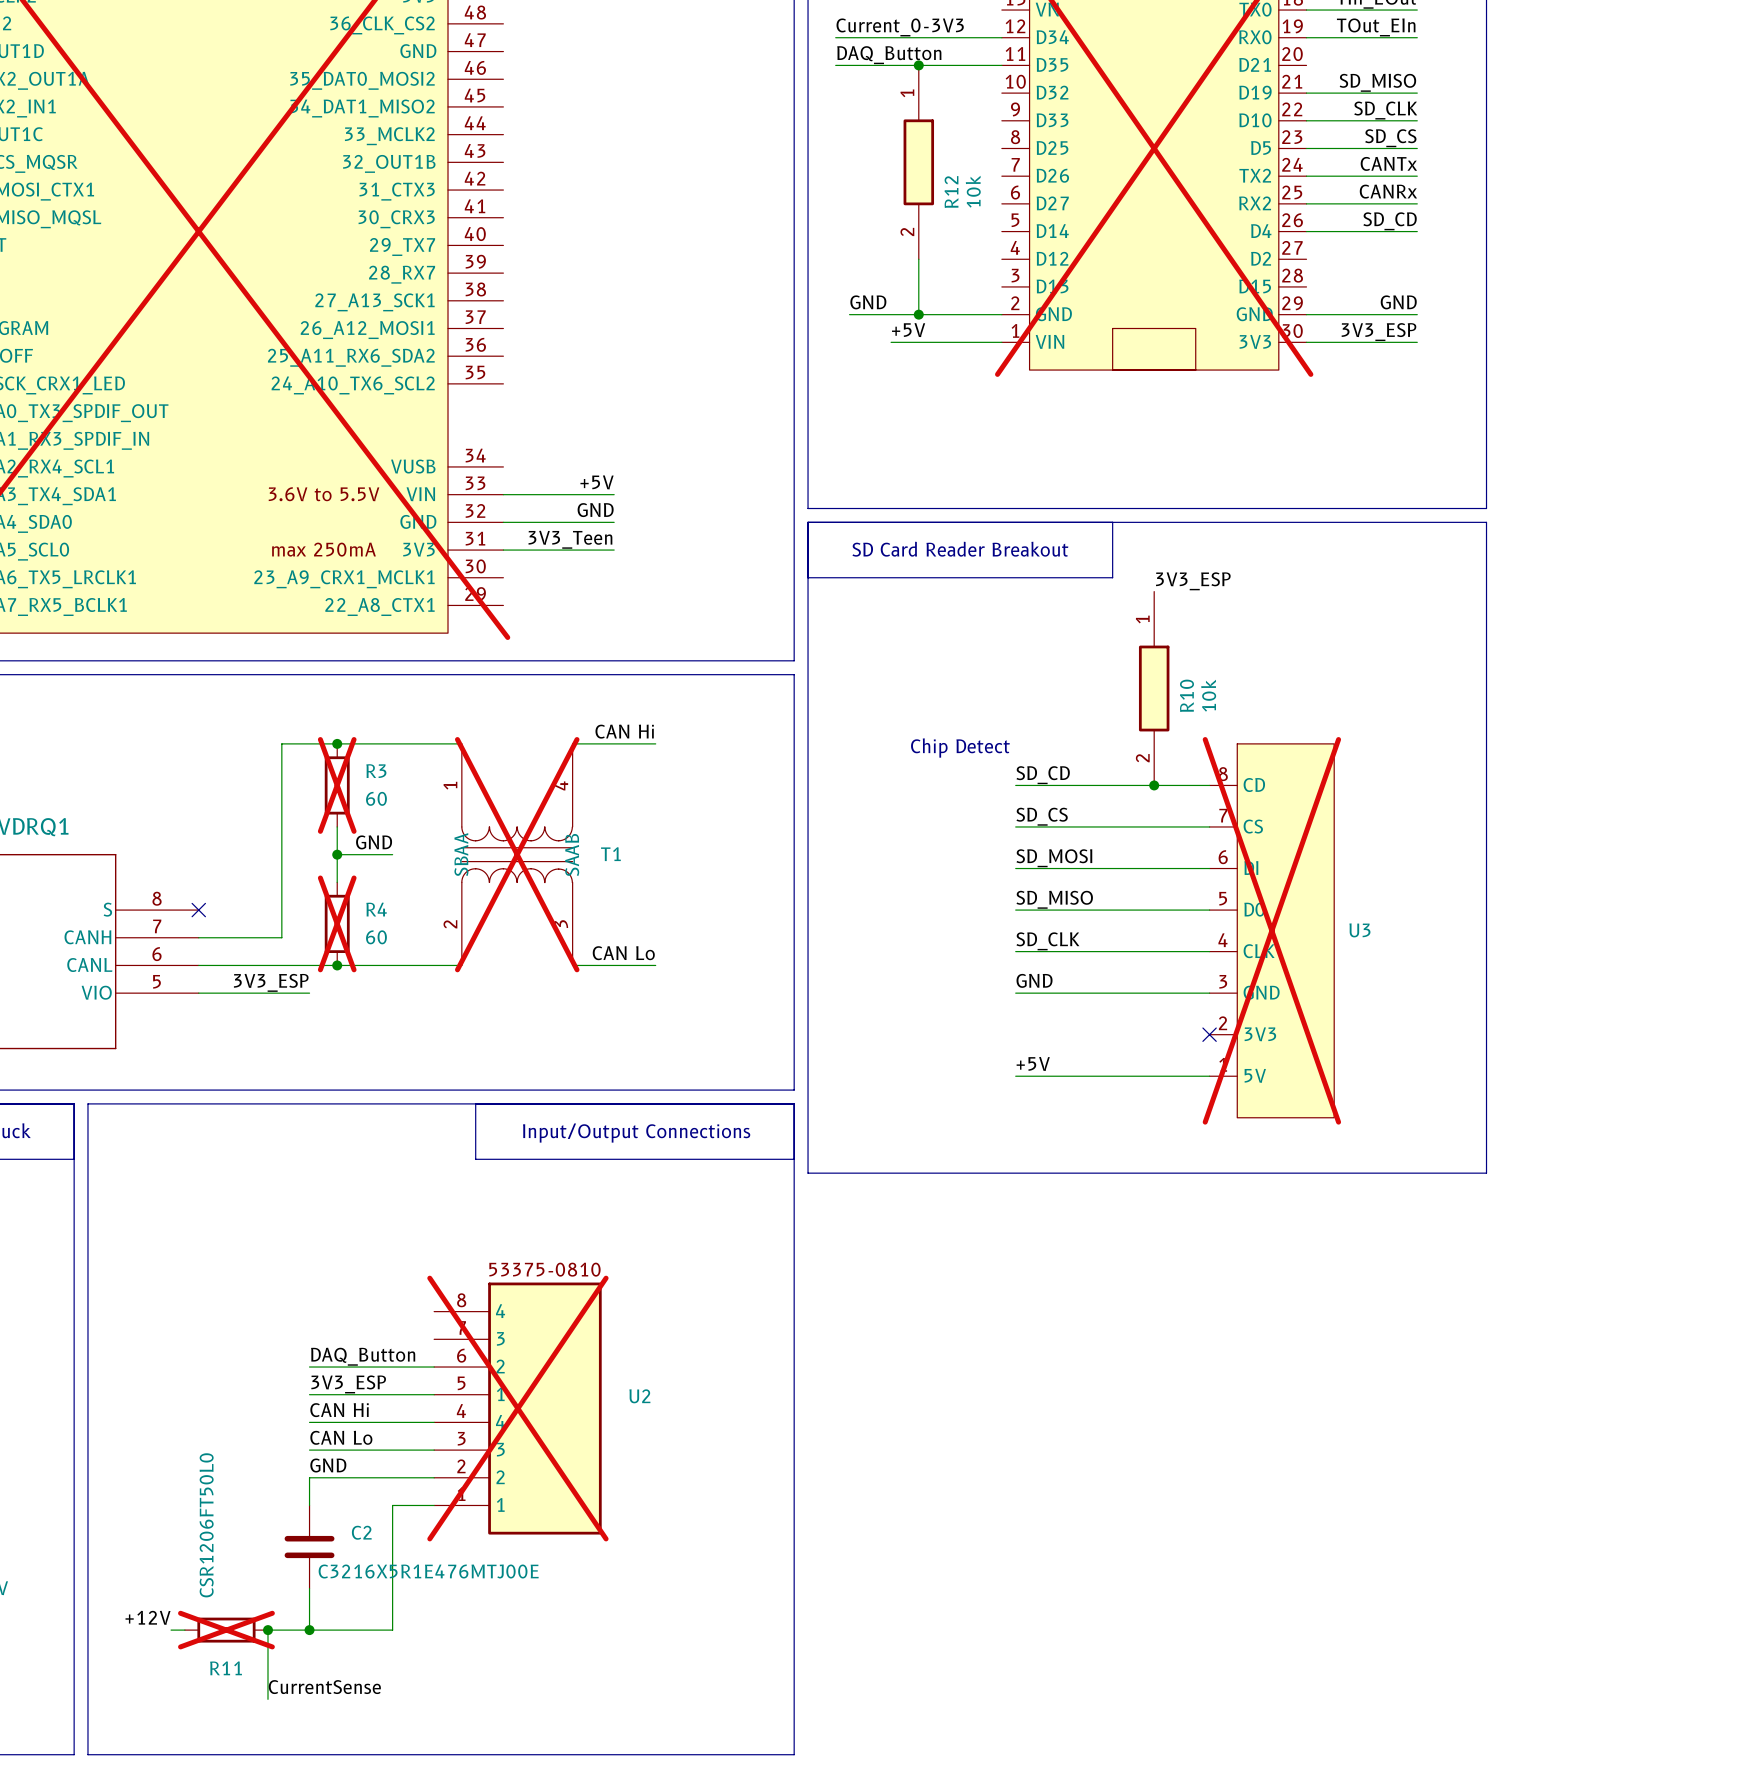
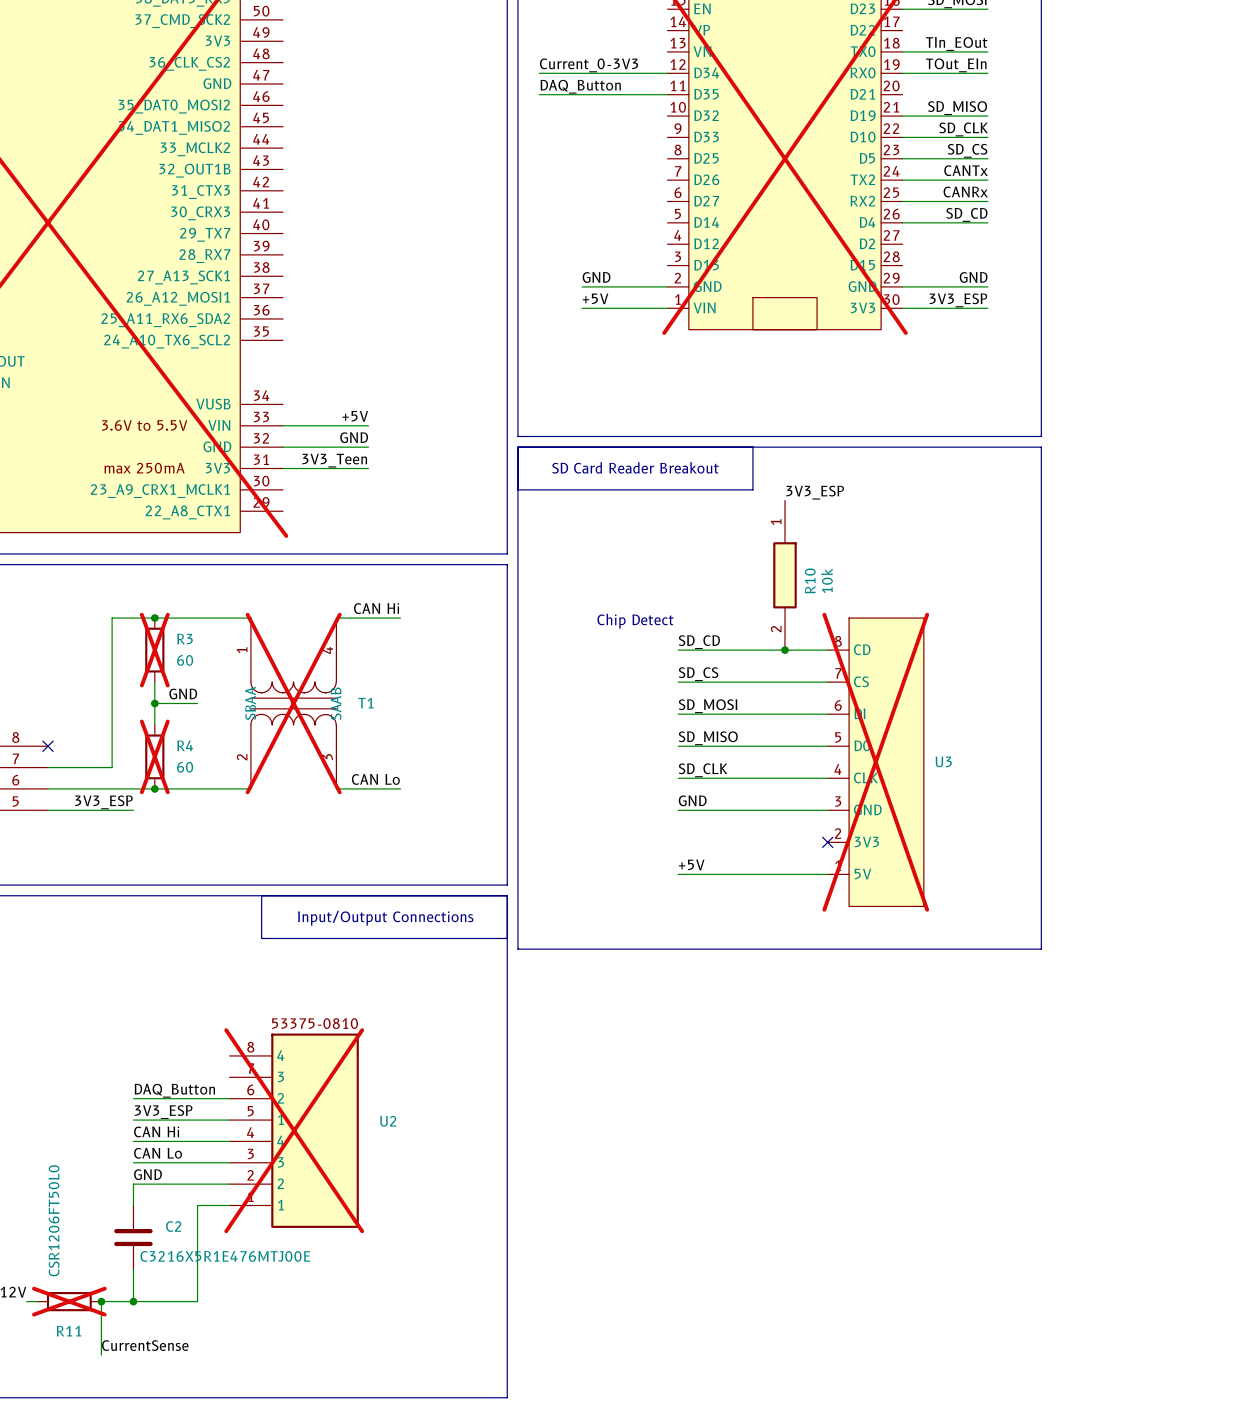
junction: (918, 65) -> none
R12: 10k (918, 162) -> none
wire: (918, 259) (918, 314) -> none
label position: GND (868, 302) -> GND (596, 277)
wire: (849, 314) (891, 314) -> none
junction: (918, 314) -> none

